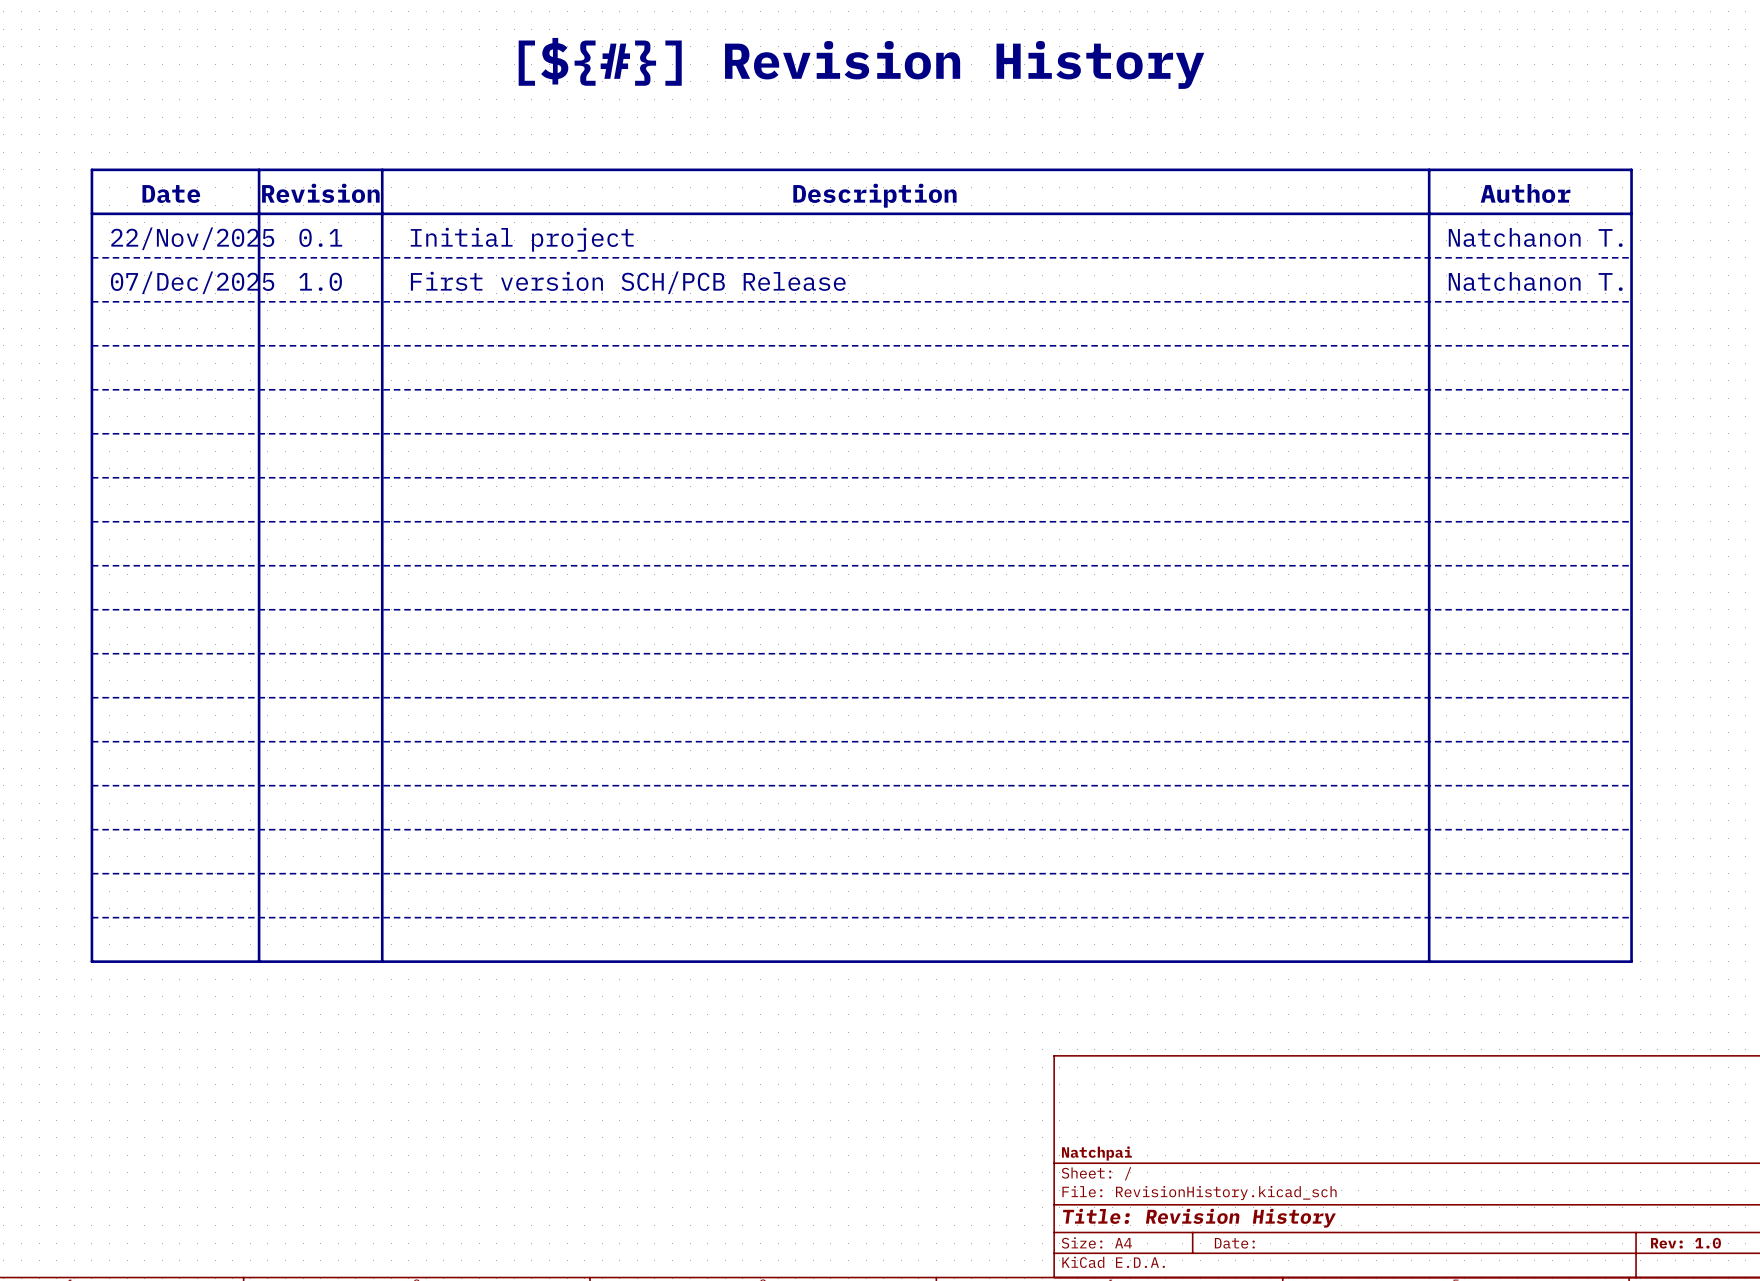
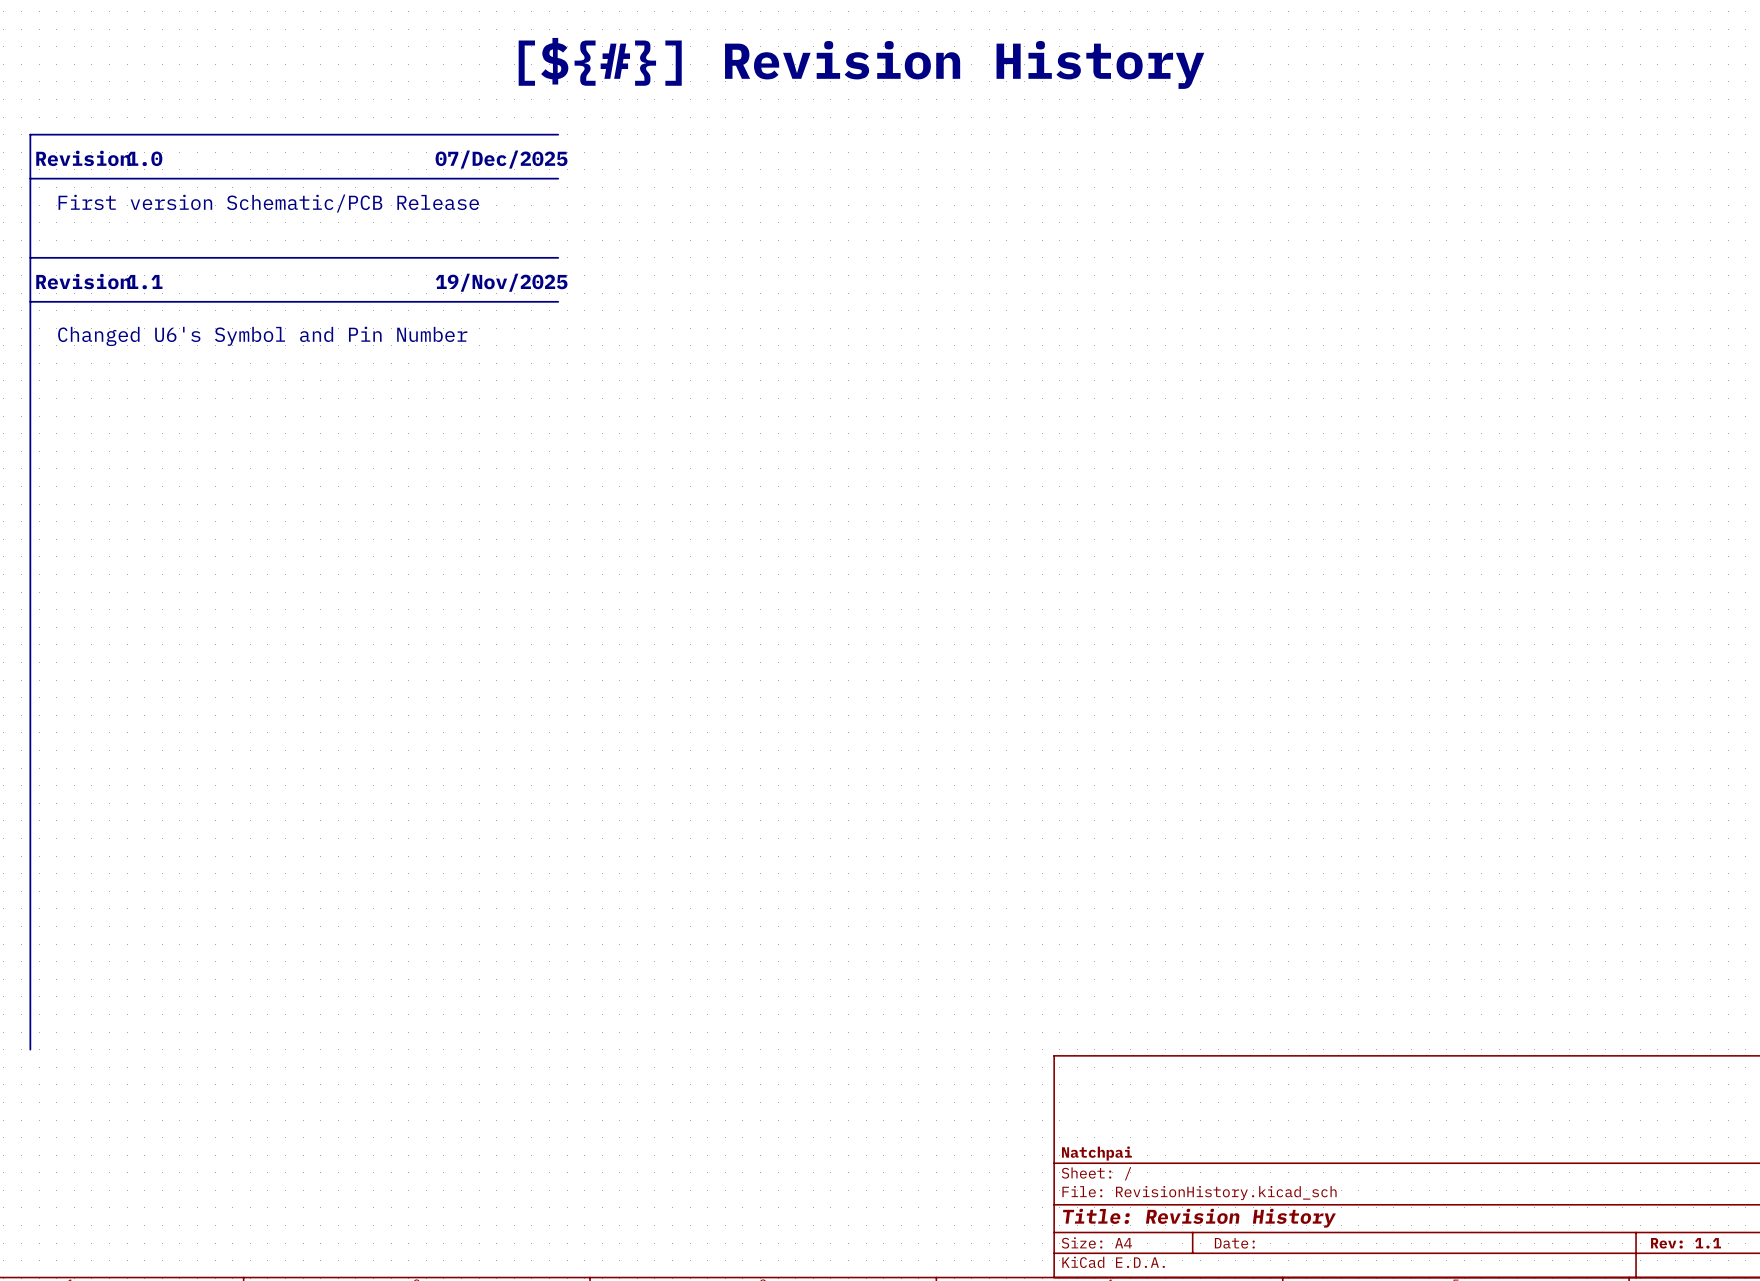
line: none -> (558, 134) (30, 134) (30, 1049)
text: none -> Revision (83, 158)
text: none -> 1.0 (144, 158)
text: none -> 07/Dec/2025 (501, 159)
line: (91, 169) (1631, 169) (1631, 961) (91, 961) (91, 169) -> none
line: (259, 169) (259, 961) -> none
line: (382, 169) (382, 961) -> none
line: (1429, 169) (1429, 961) -> none
line: none -> (30, 178) (558, 178)
text: Revision (320, 193) -> none
text: Author (1525, 193) -> none
text: Date (171, 194) -> none
text: Description (874, 195) -> none
text: none -> First version Schematic/PCB Release (268, 203)
line: (91, 213) (1631, 213) -> none
text: 0.1 (320, 237) -> none
text: Natchanon T. (1535, 237) -> none
text: 22/Nov/2025 (192, 238) -> none
text: Initial project (522, 239) -> none
line: none -> (30, 257) (558, 257)
line: (91, 257) (1631, 257) -> none
text: none -> Revision (83, 281)
text: 1.0 (320, 281) -> none
text: Natchanon T. (1535, 281) -> none
text: none -> 1.1 (144, 282)
text: 07/Dec/2025 (192, 282) -> none
text: none -> 19/Nov/2025 (501, 282)
text: First version SCH/PCB Release (628, 282) -> none
line: none -> (30, 301) (558, 301)
line: (91, 301) (1631, 301) -> none
text: none -> Changed U6's Symbol and Pin Number (262, 336)
line: (91, 345) (1631, 345) -> none
line: (91, 389) (1631, 389) -> none
line: (91, 433) (1631, 433) -> none
line: (91, 477) (1631, 477) -> none
line: (91, 521) (1631, 521) -> none
line: (91, 565) (1631, 565) -> none
line: (91, 609) (1631, 609) -> none
line: (91, 653) (1631, 653) -> none
line: (91, 697) (1631, 697) -> none
line: (91, 741) (1631, 741) -> none
line: (91, 785) (1631, 785) -> none
line: (91, 829) (1631, 829) -> none
line: (91, 873) (1631, 873) -> none
line: (91, 917) (1631, 917) -> none
title block: Rev: 1.0 (1685, 1243) -> Rev: 1.1 (1686, 1243)

